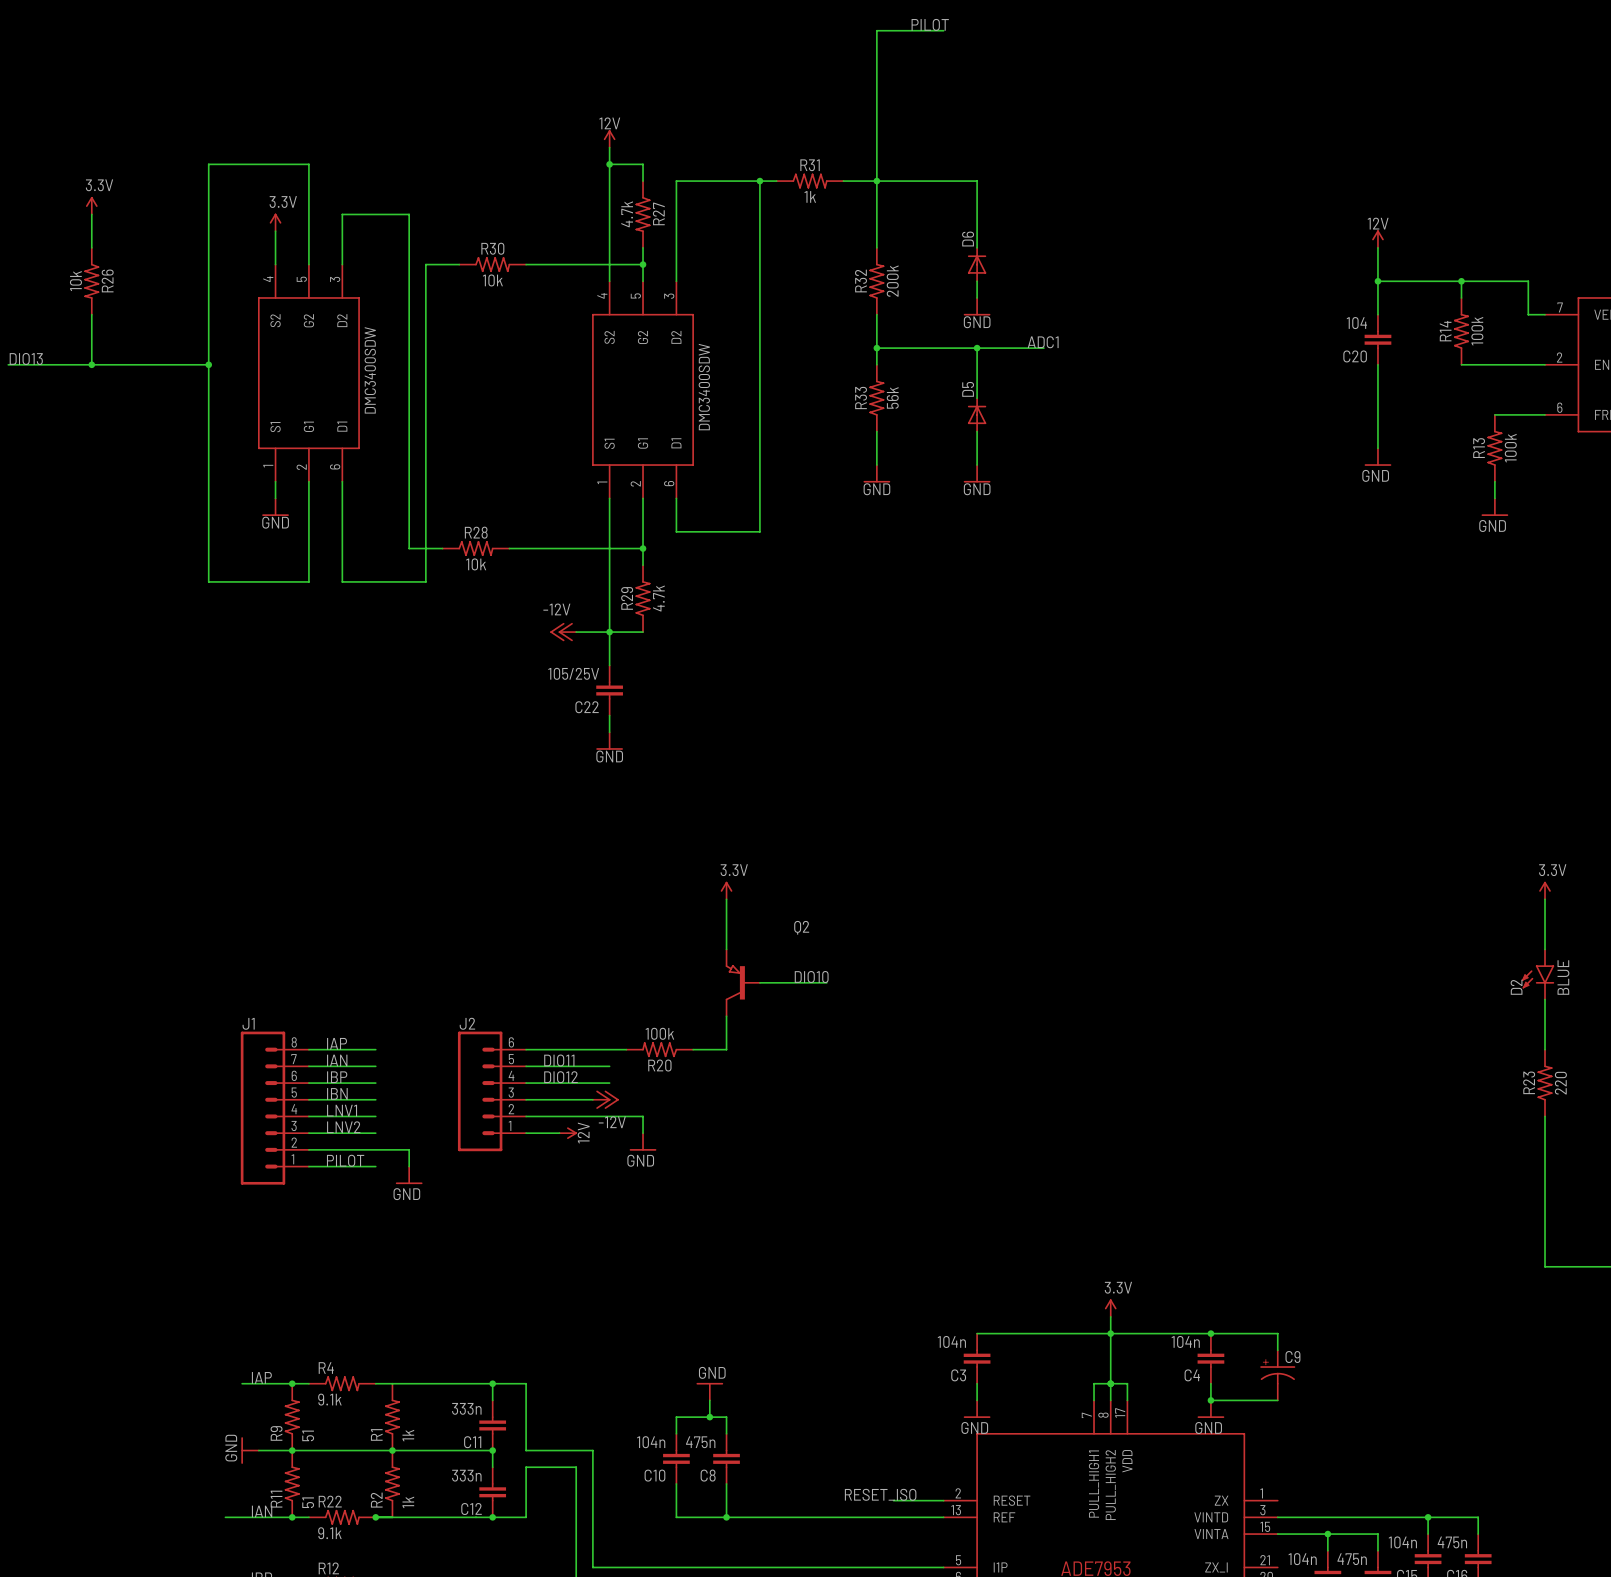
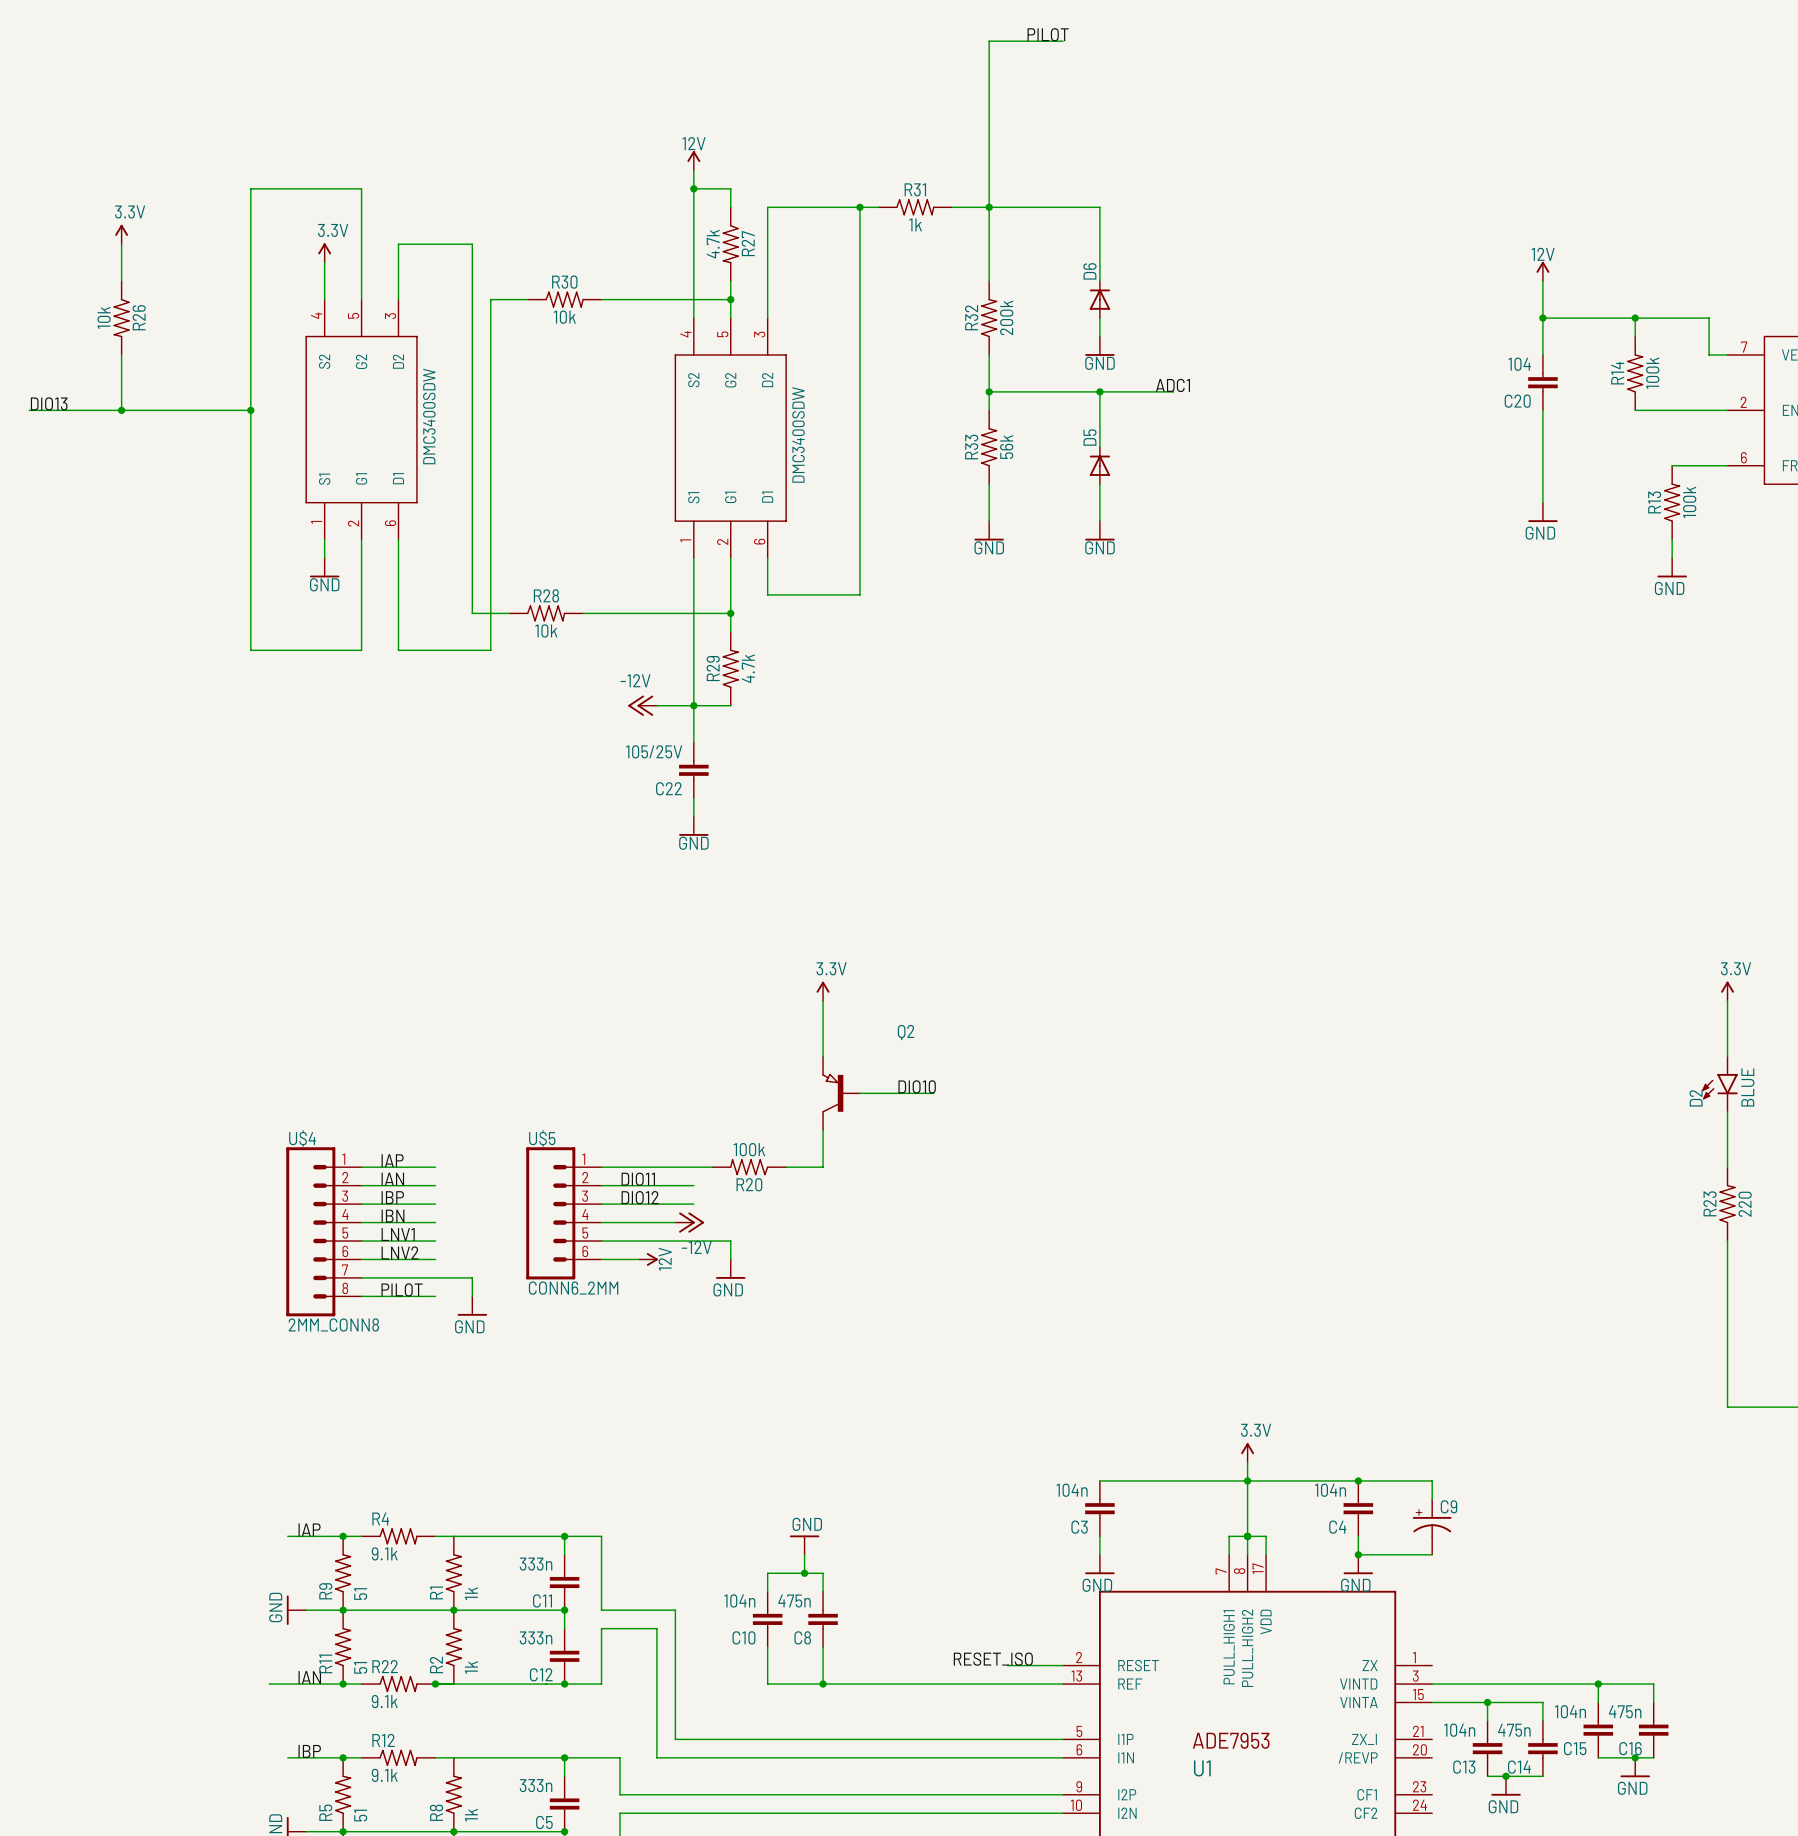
J1 name: J1 (248, 1023) -> U$4 (302, 1138)
J2 name: J2 (467, 1023) -> U$5 (542, 1138)
J2 flip: as is (480, 1091) -> up-down (550, 1213)
J1 flip: as is (263, 1108) -> up-down (310, 1231)
J2 value: none -> CONN6_2MM (573, 1288)
J1 value: none -> 2MM_CONN8 (333, 1324)

